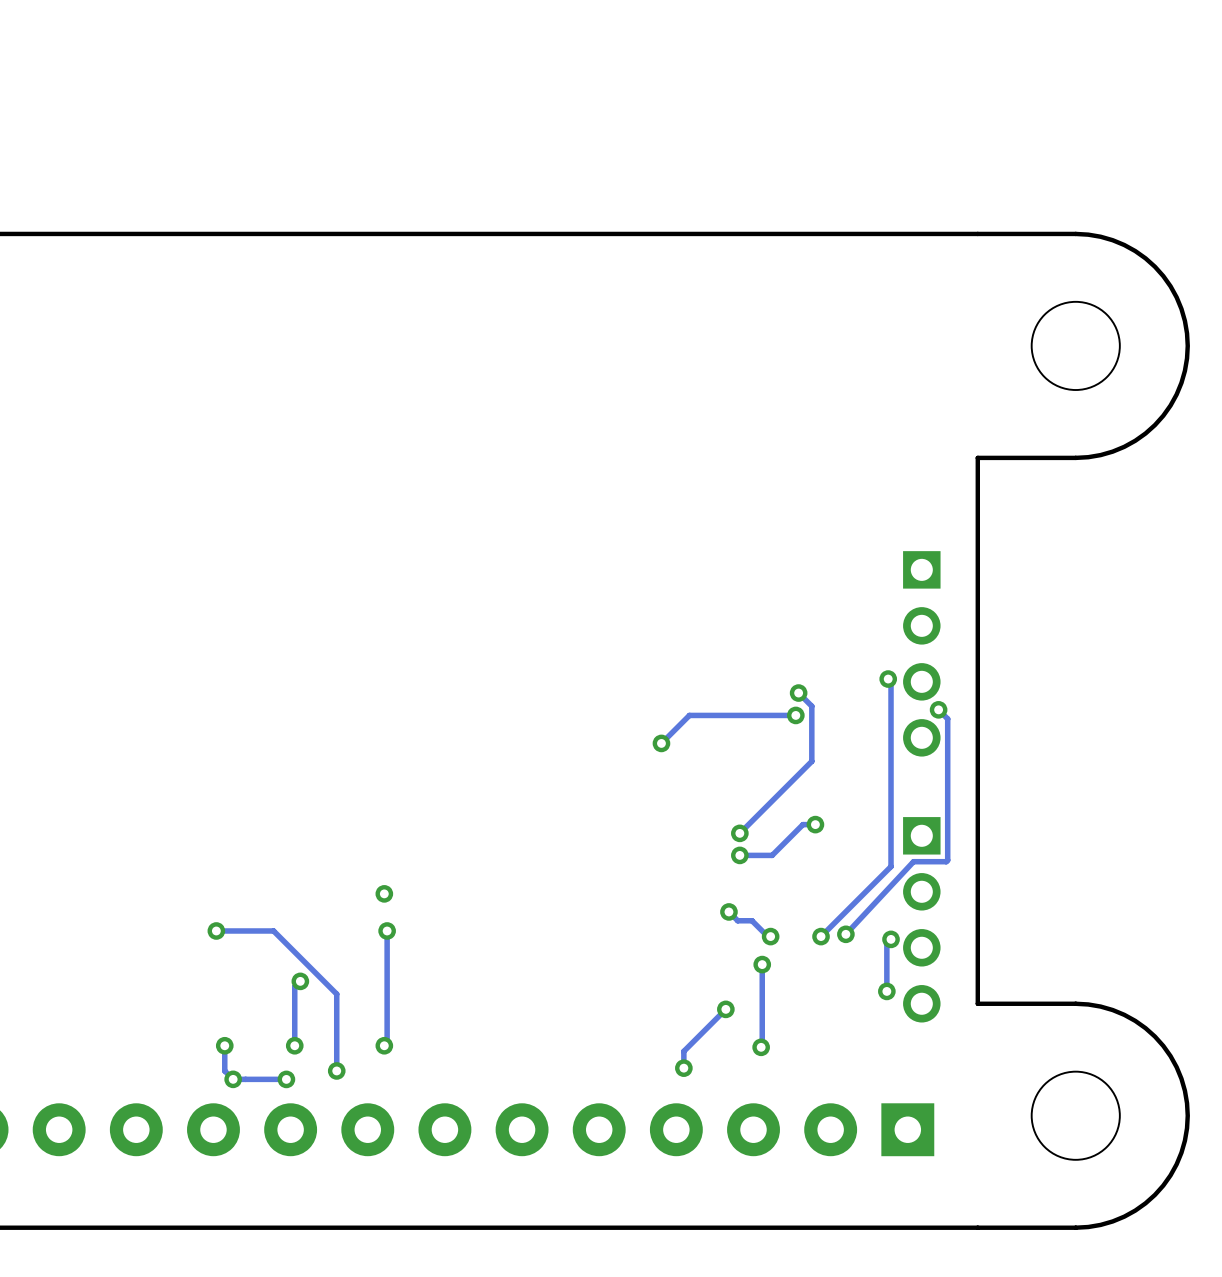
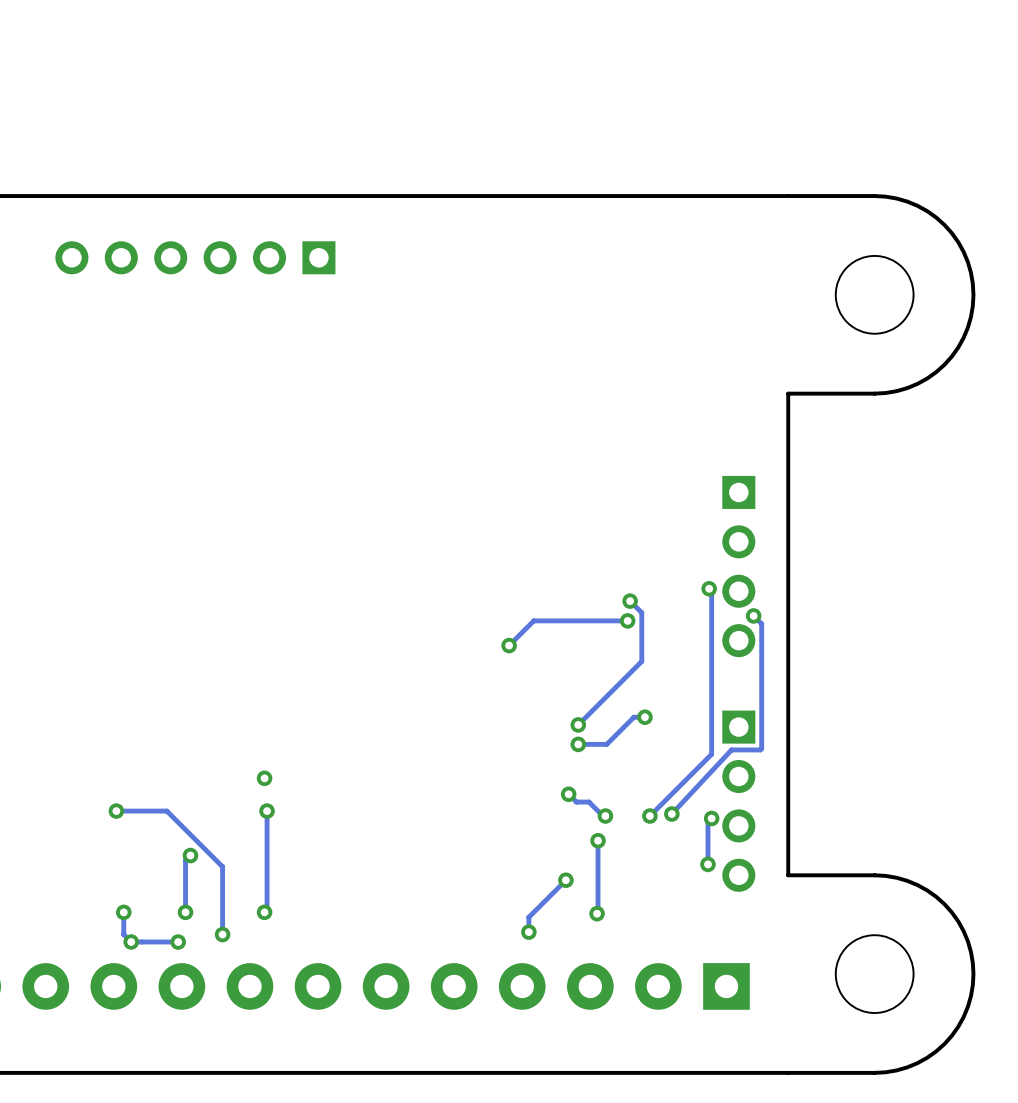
part: none -> (195, 257)

